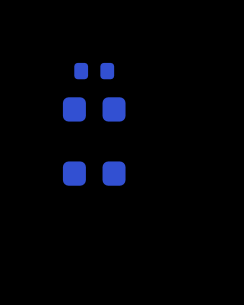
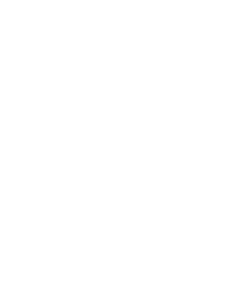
part: (94, 71) -> none
part: (94, 109) -> none
part: (94, 173) -> none

